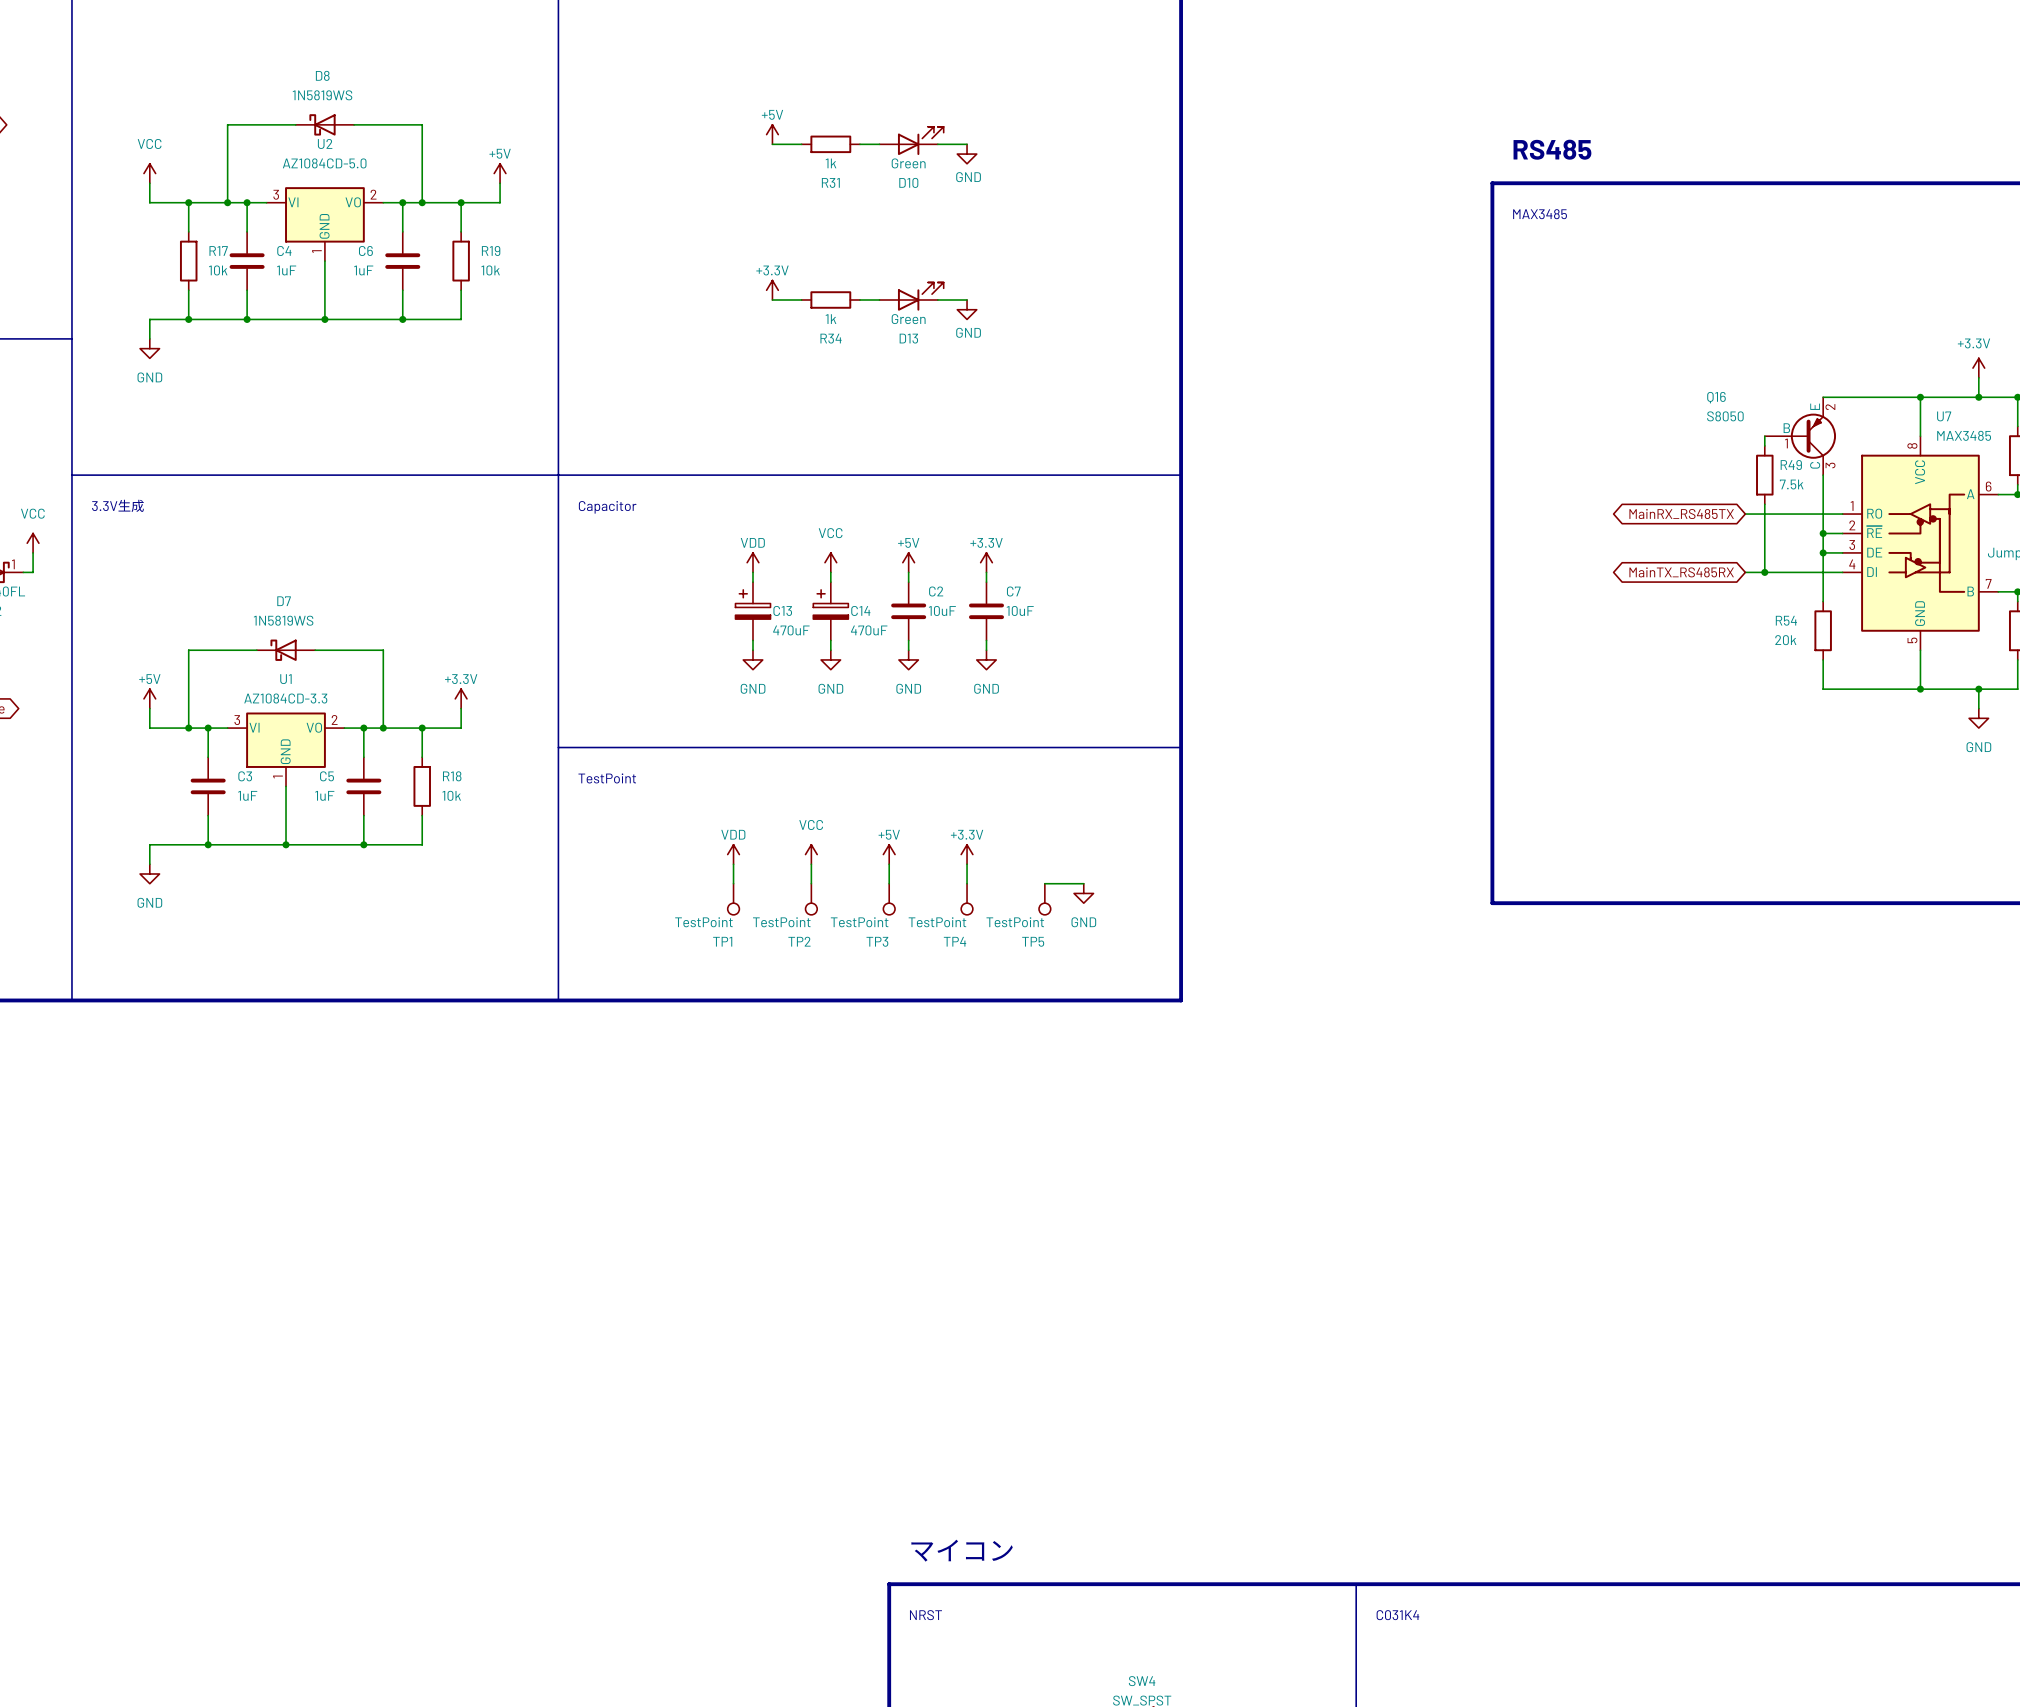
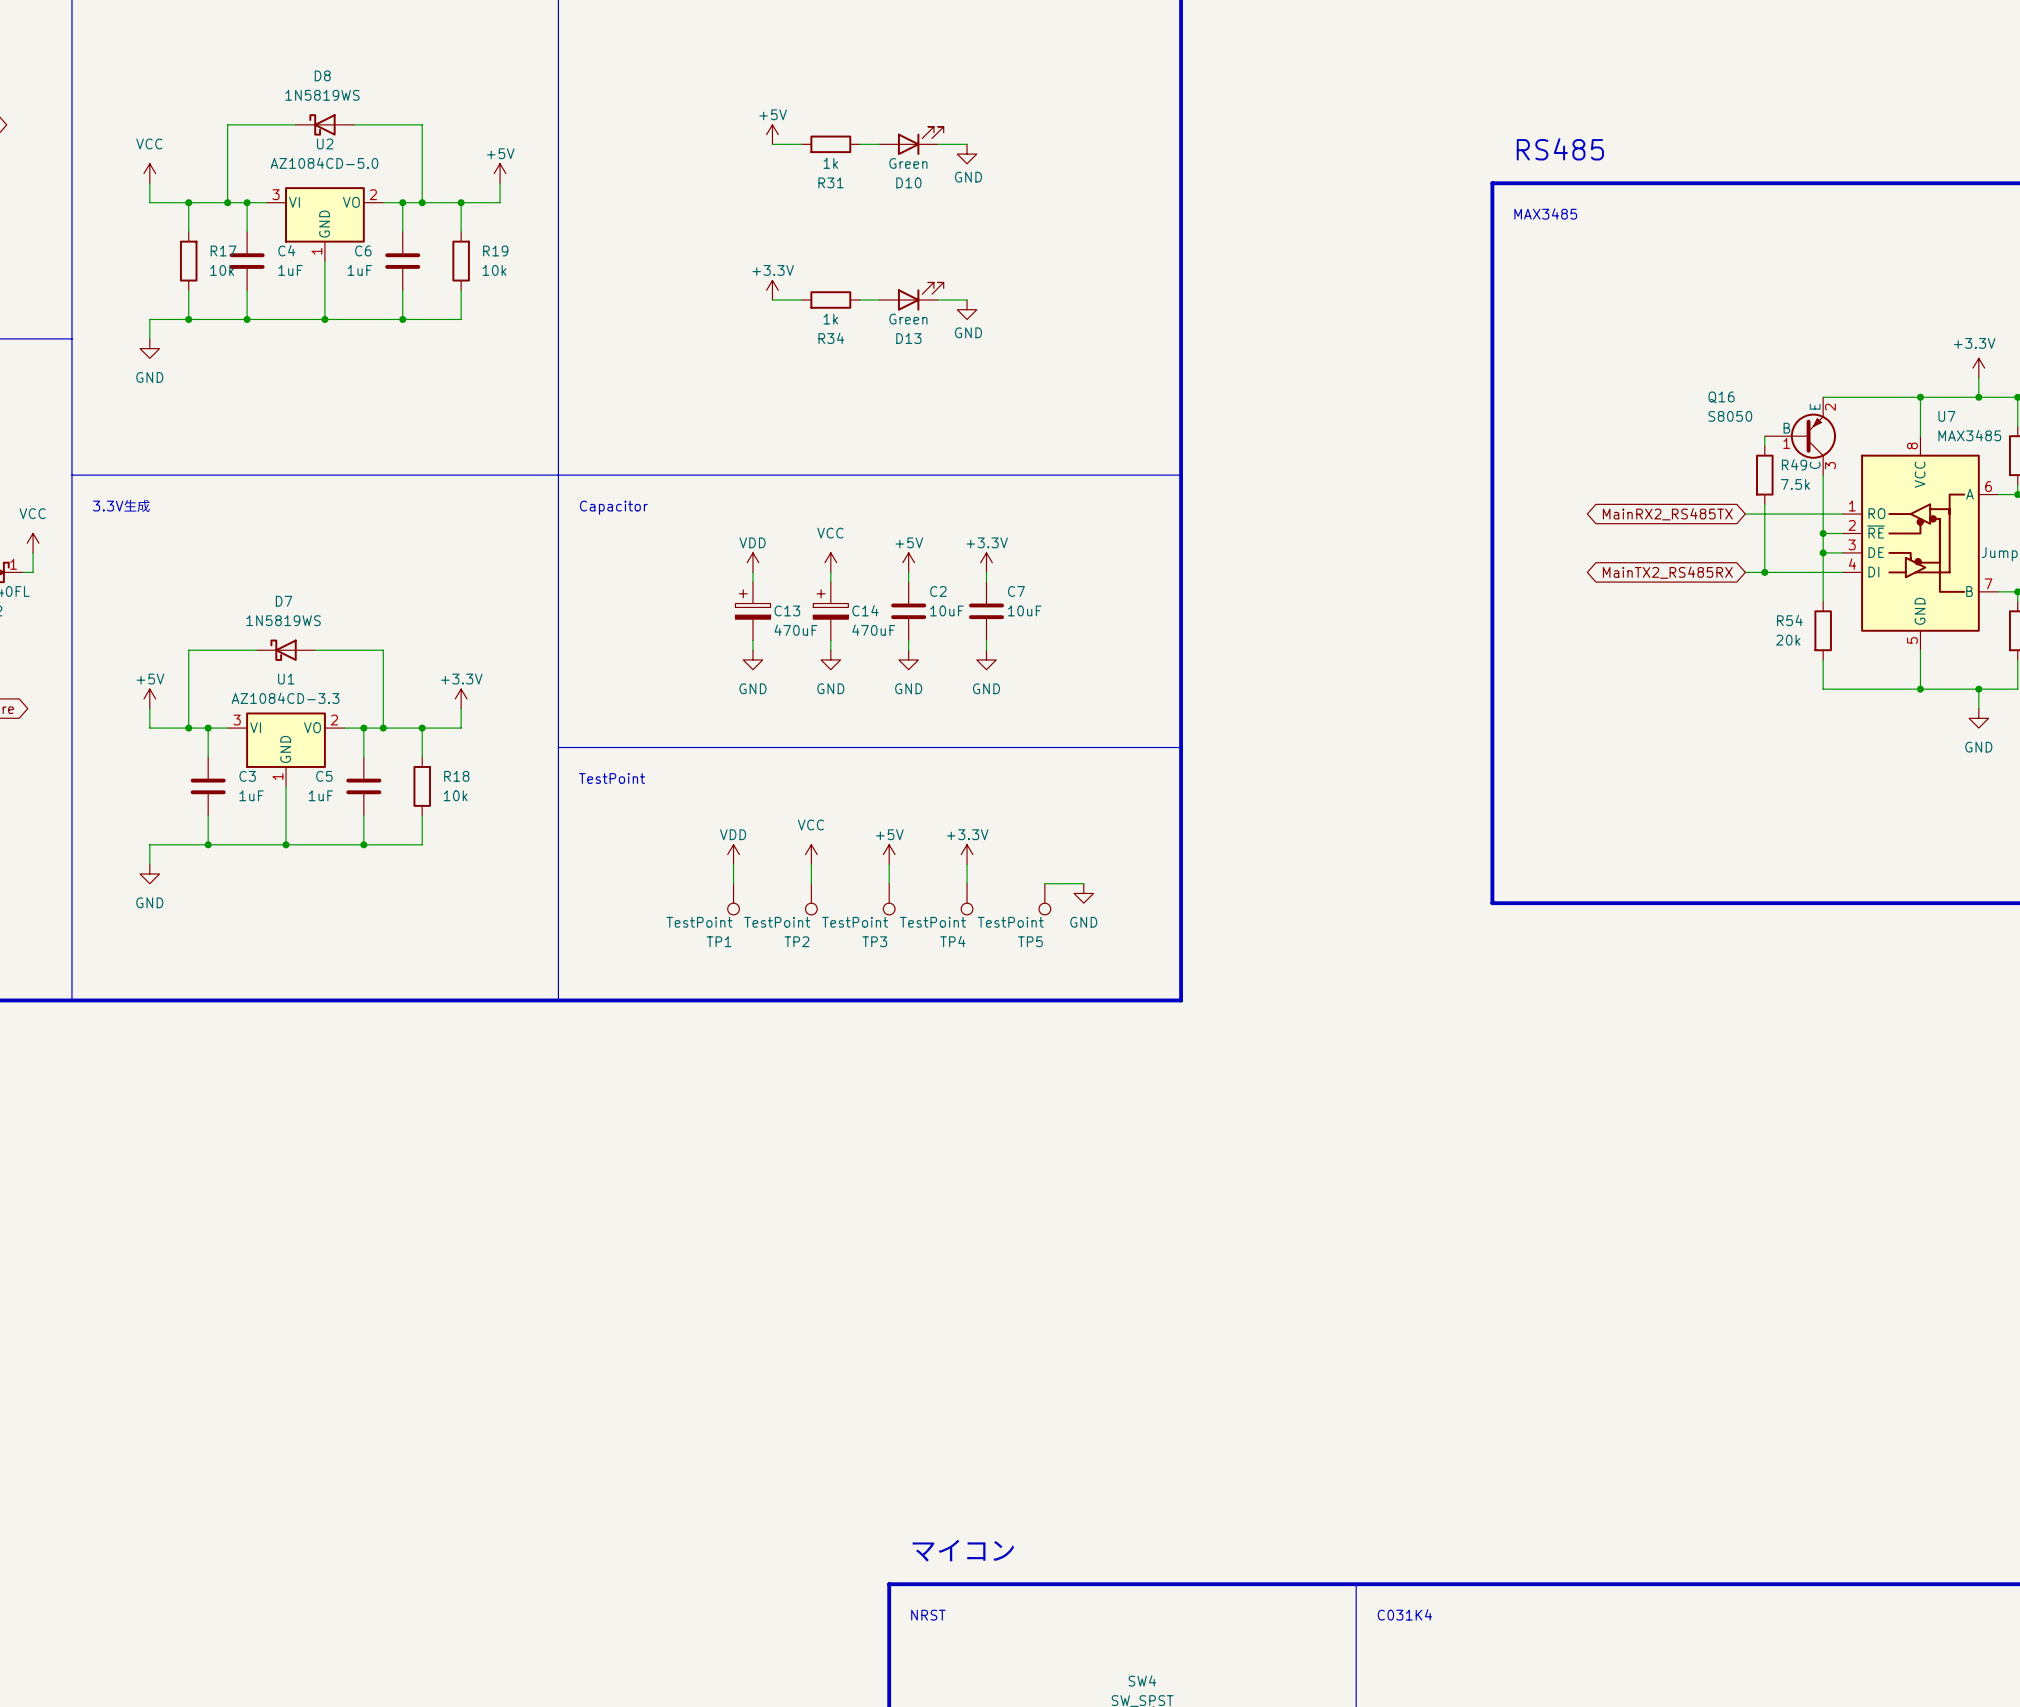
global label: MainRX_RS485TX (1681, 514) -> MainRX2_RS485TX (1667, 514)
global label: MainTX_RS485RX (1681, 572) -> MainTX2_RS485RX (1667, 572)

